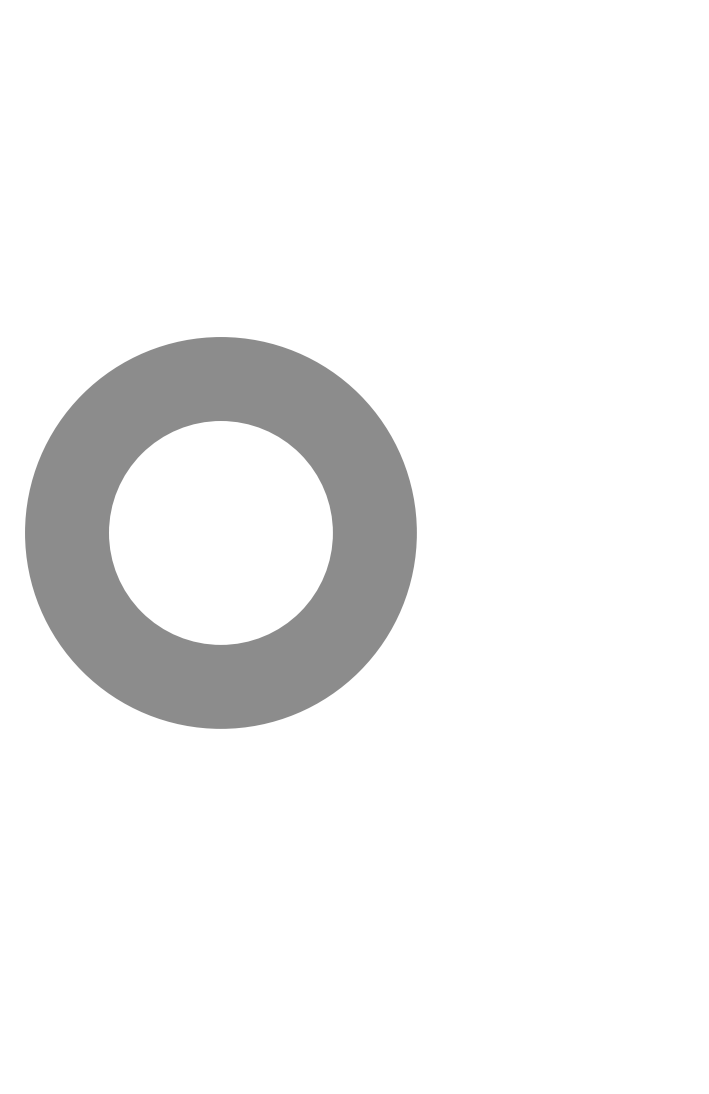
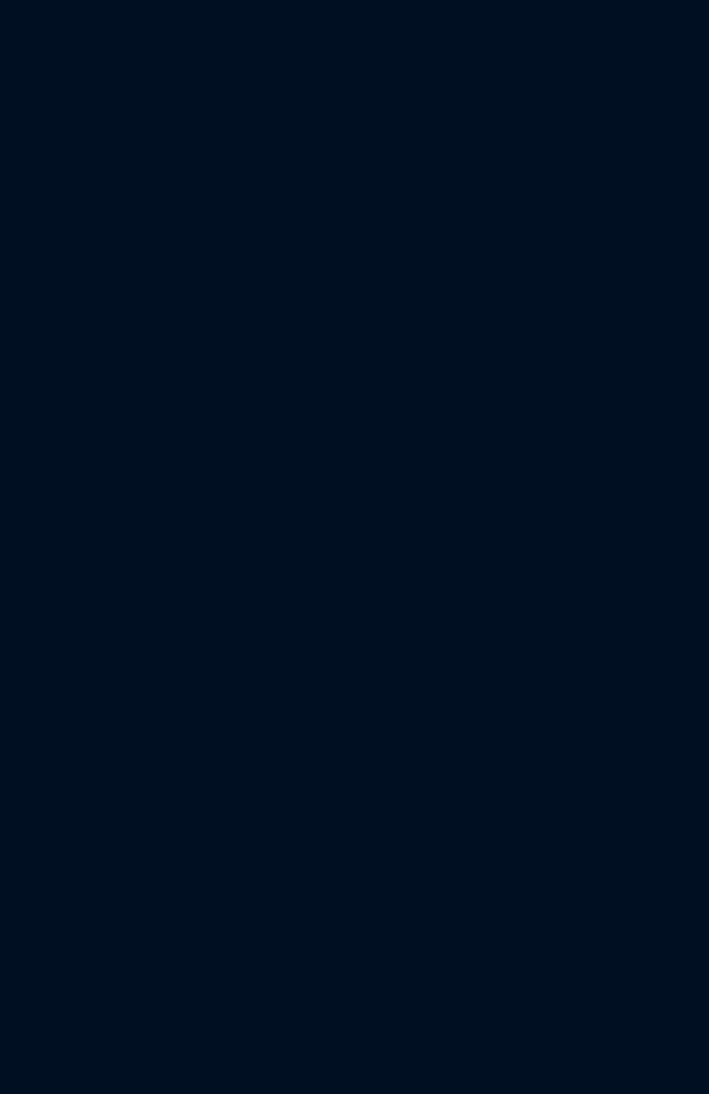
part: (220, 532) -> none

